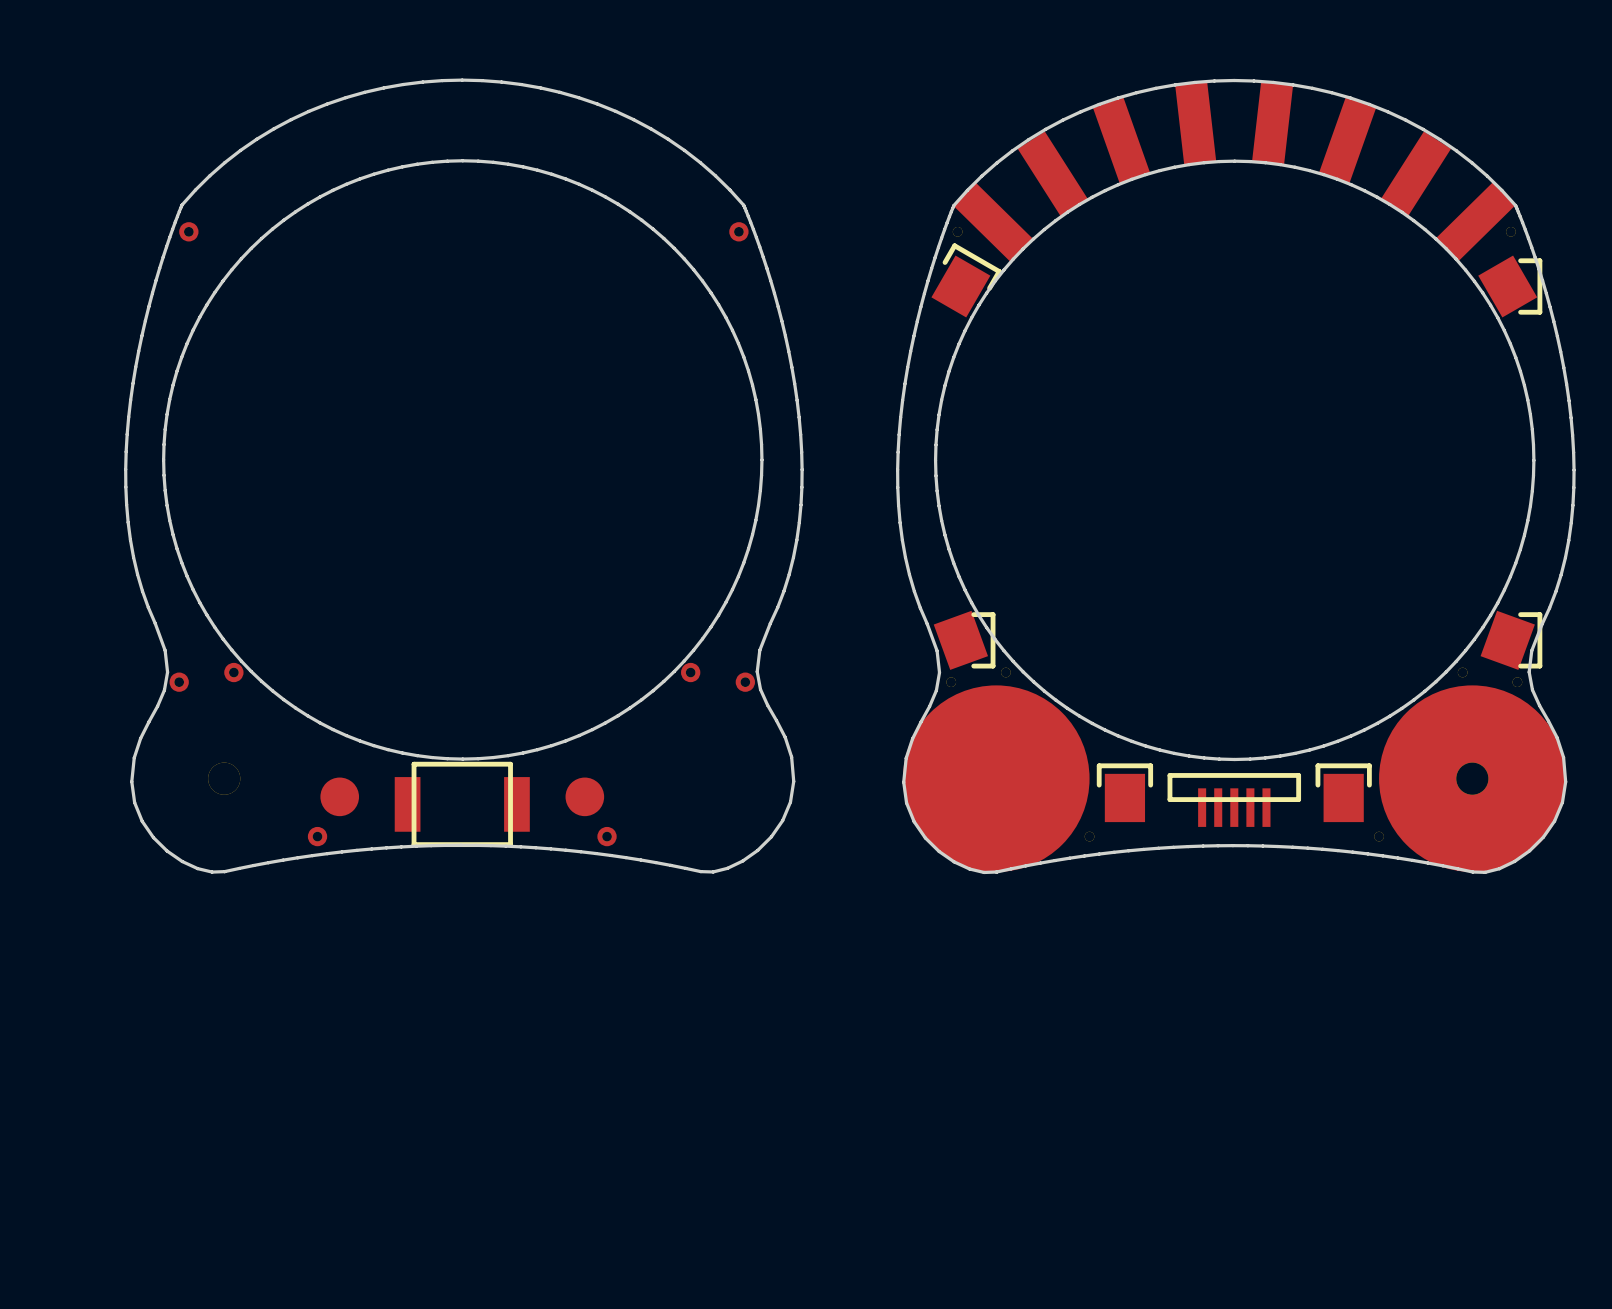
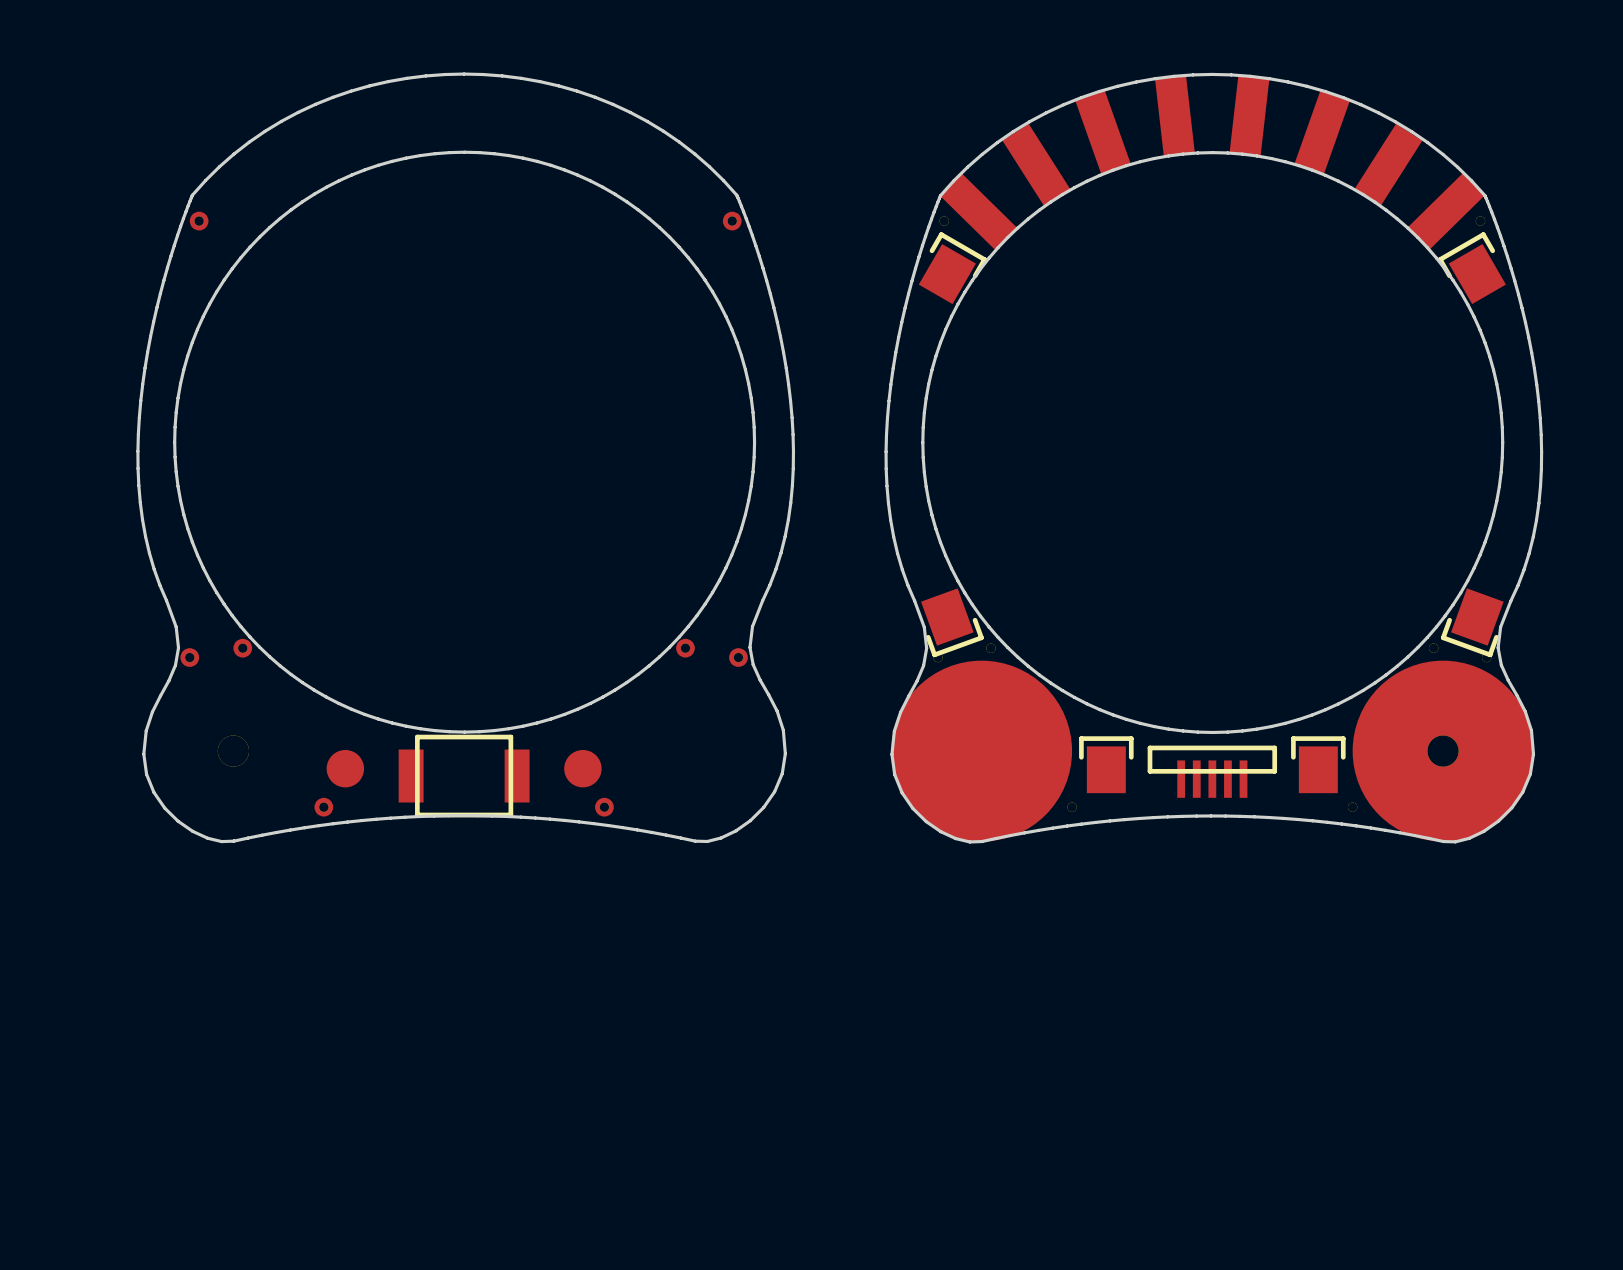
part footprint: [1478, 255, 1543, 318] -> [1437, 232, 1506, 305]
part footprint: [933, 610, 996, 670] -> [921, 588, 984, 658]
part footprint: [1480, 610, 1543, 670] -> [1440, 588, 1504, 658]

